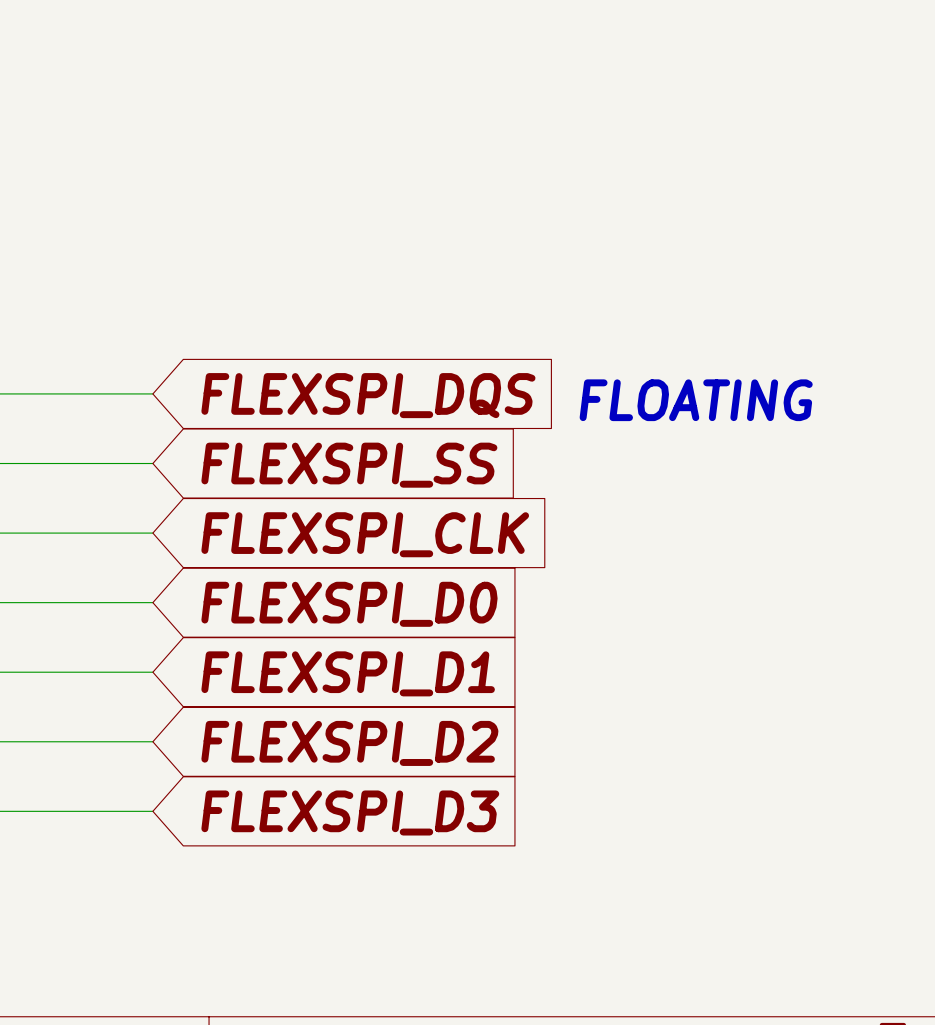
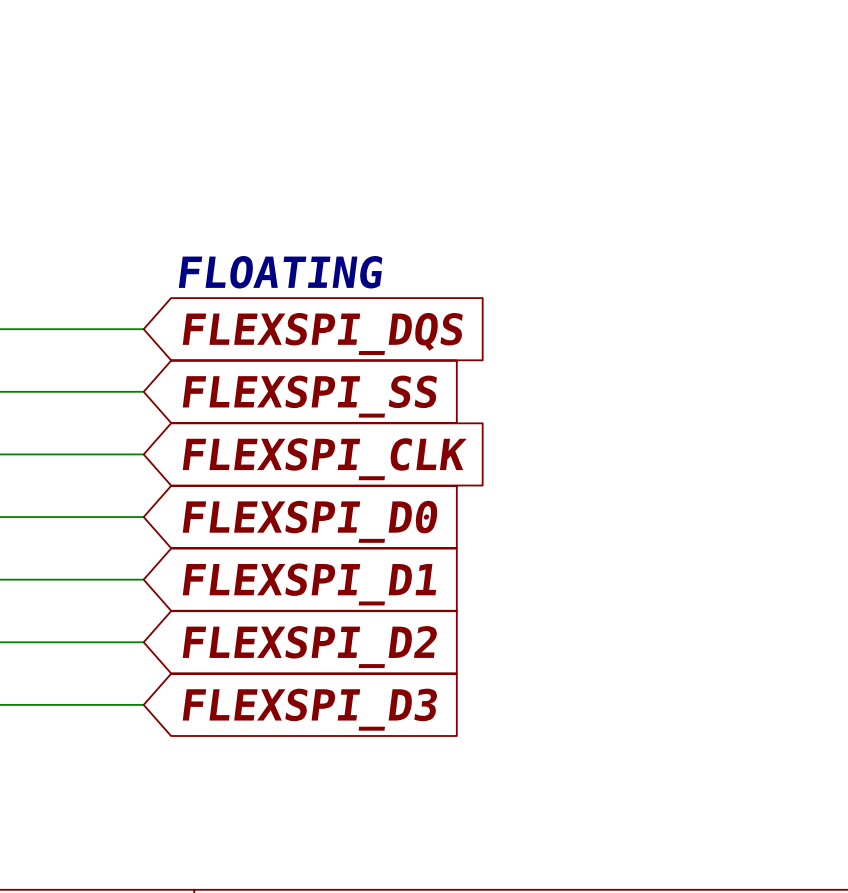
text position: FLOATING (696, 400) -> FLOATING (280, 272)

